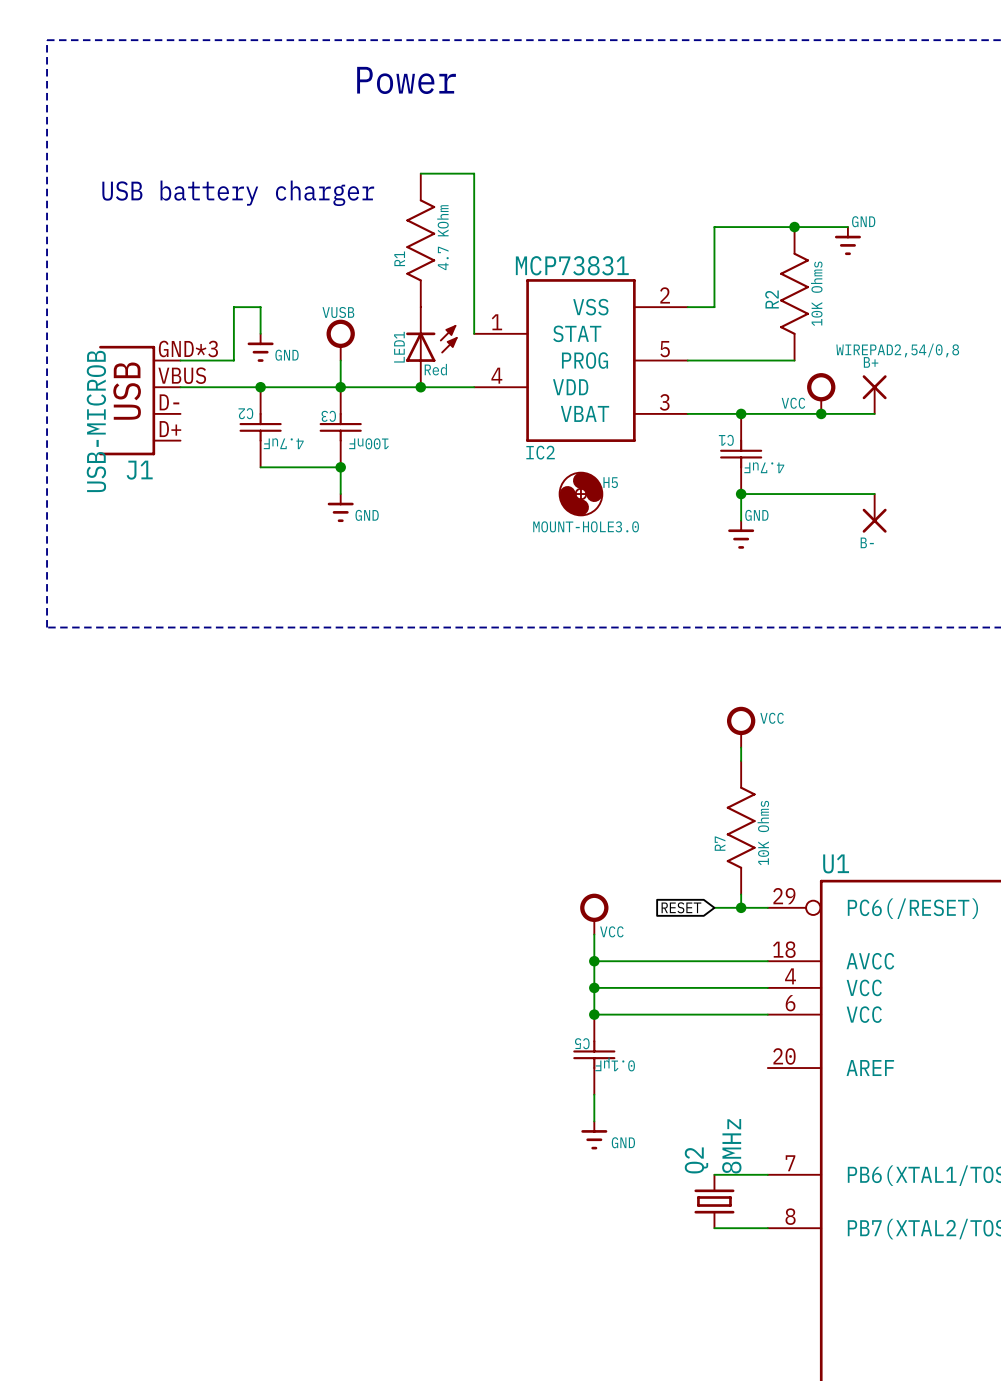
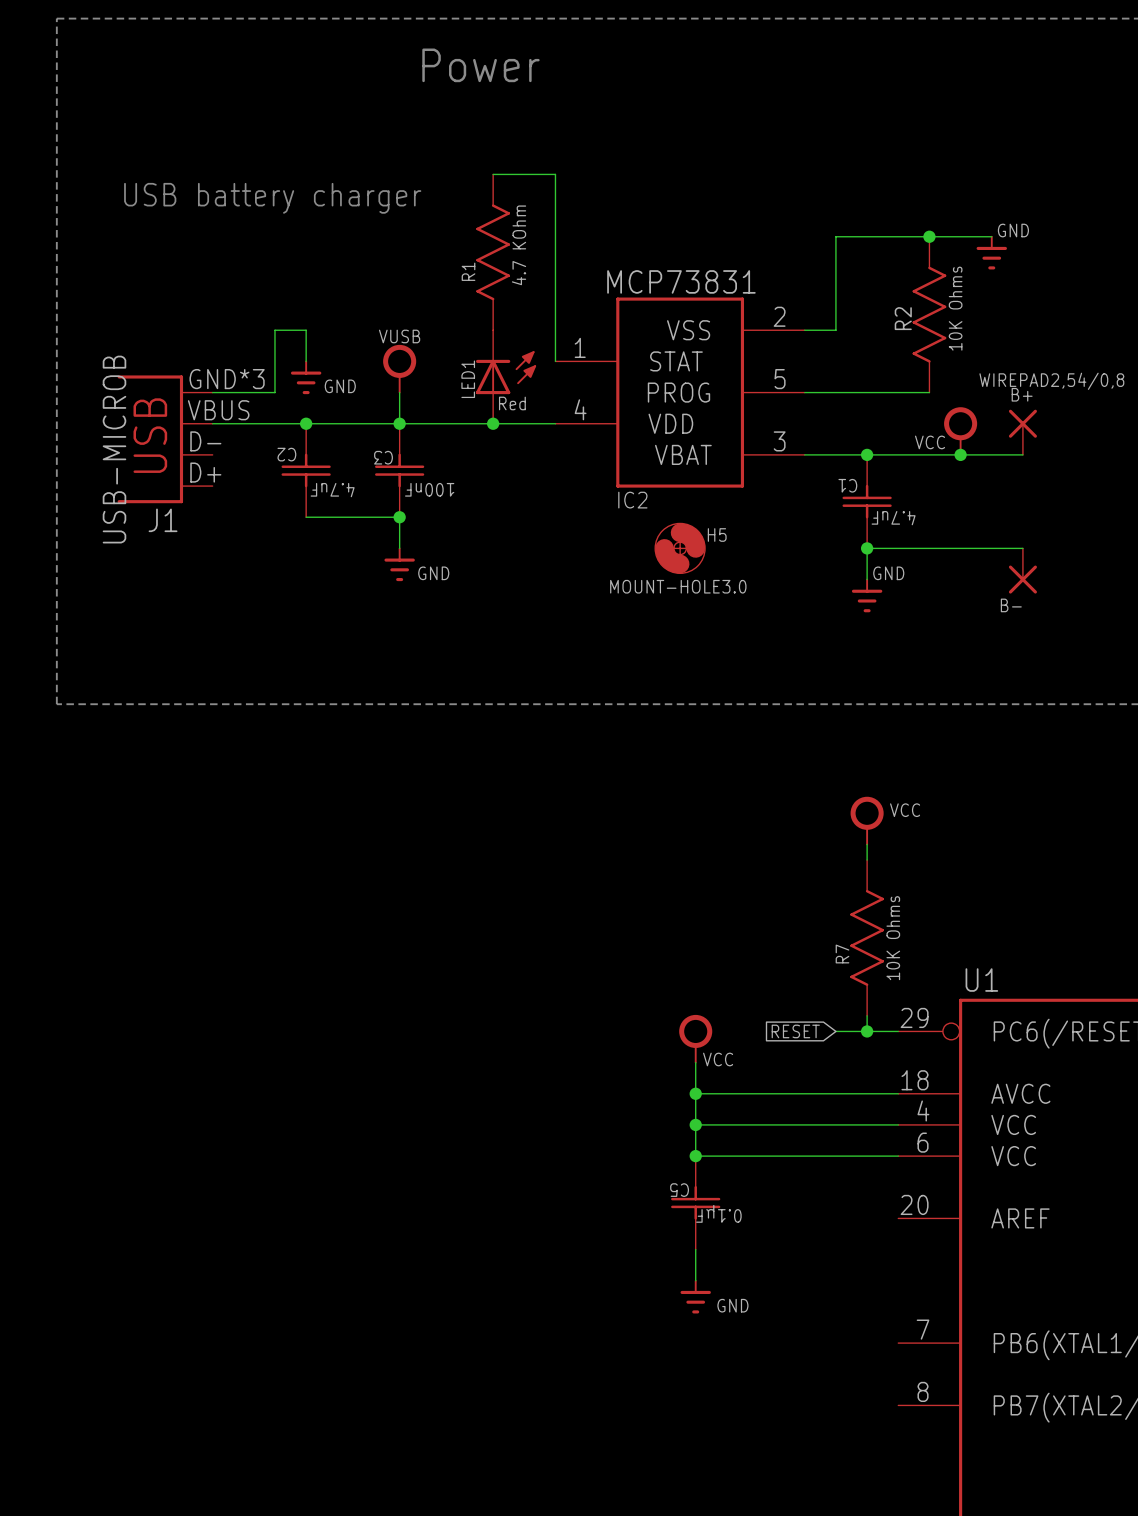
wire: (714, 1174) (767, 1174) -> none
Q2: 8MHz (714, 1201) -> none
wire: (714, 1228) (767, 1228) -> none

